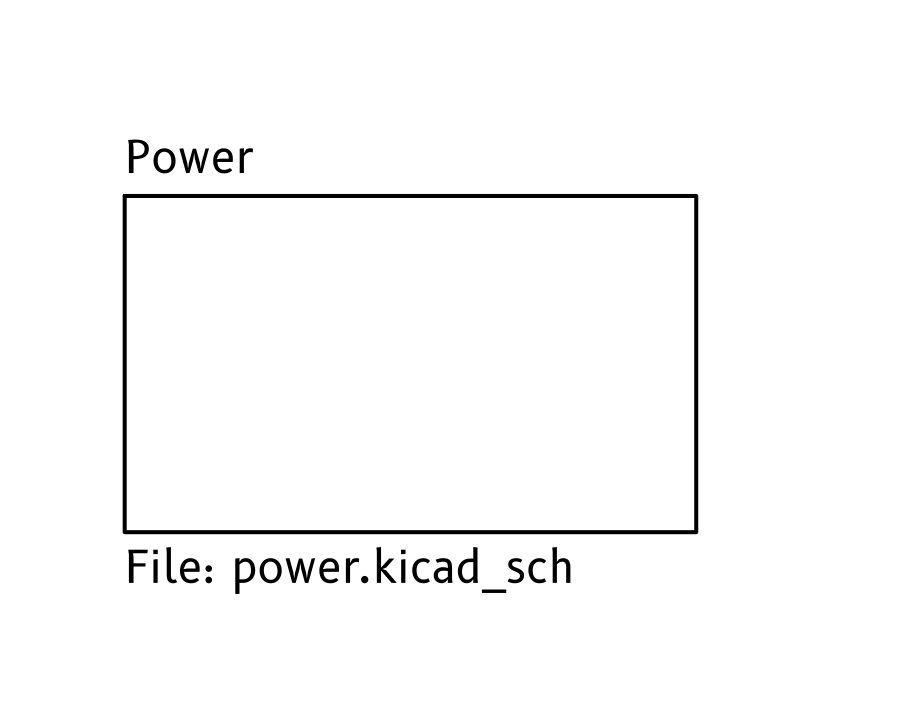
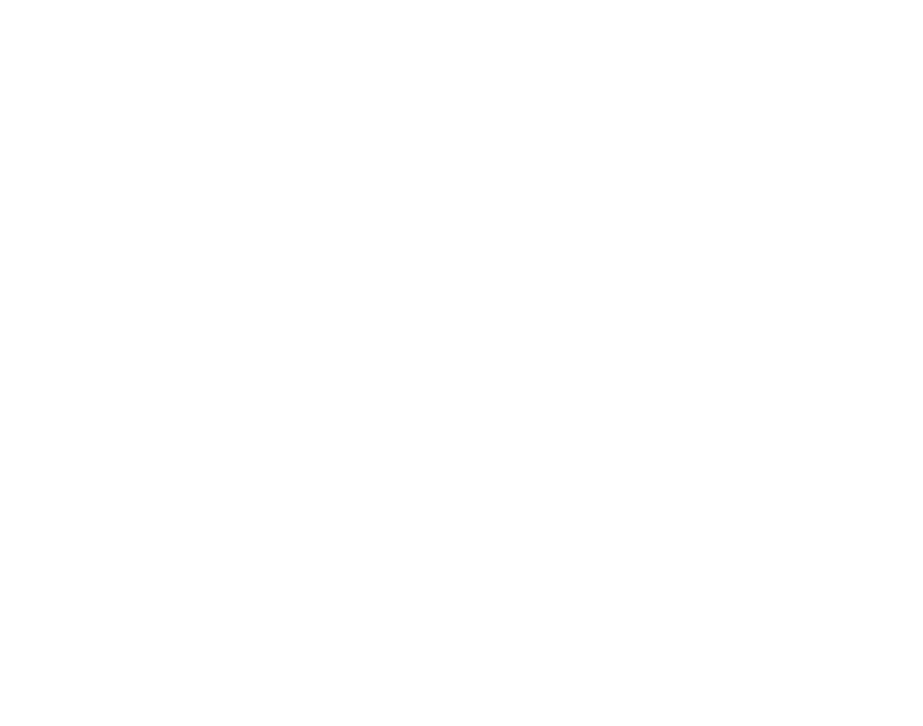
sheet Power: File: power.kicad_sch (410, 364) -> none

